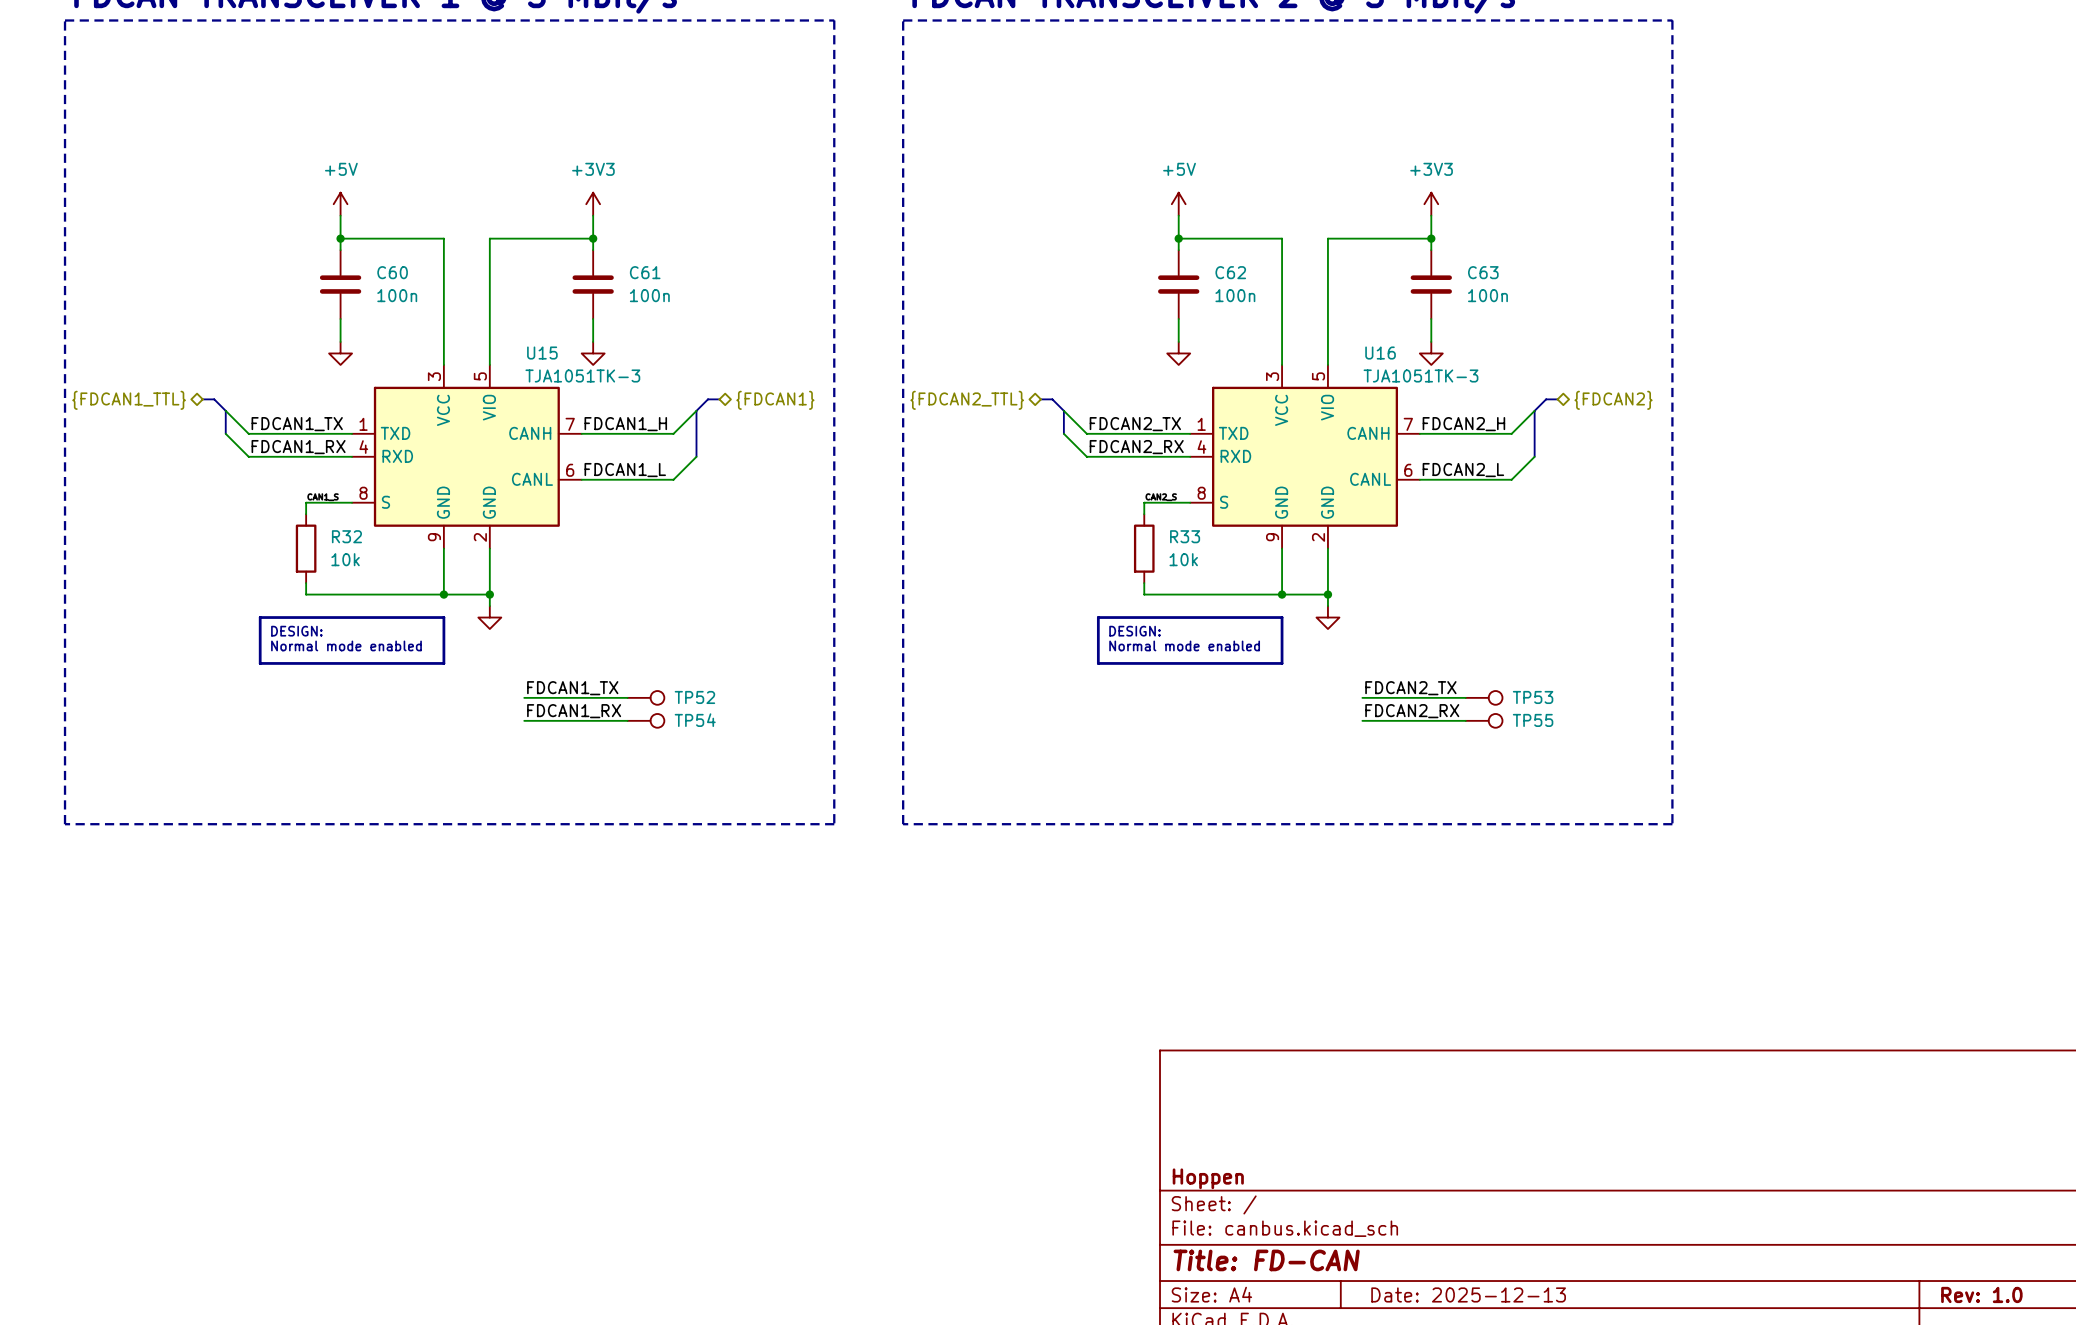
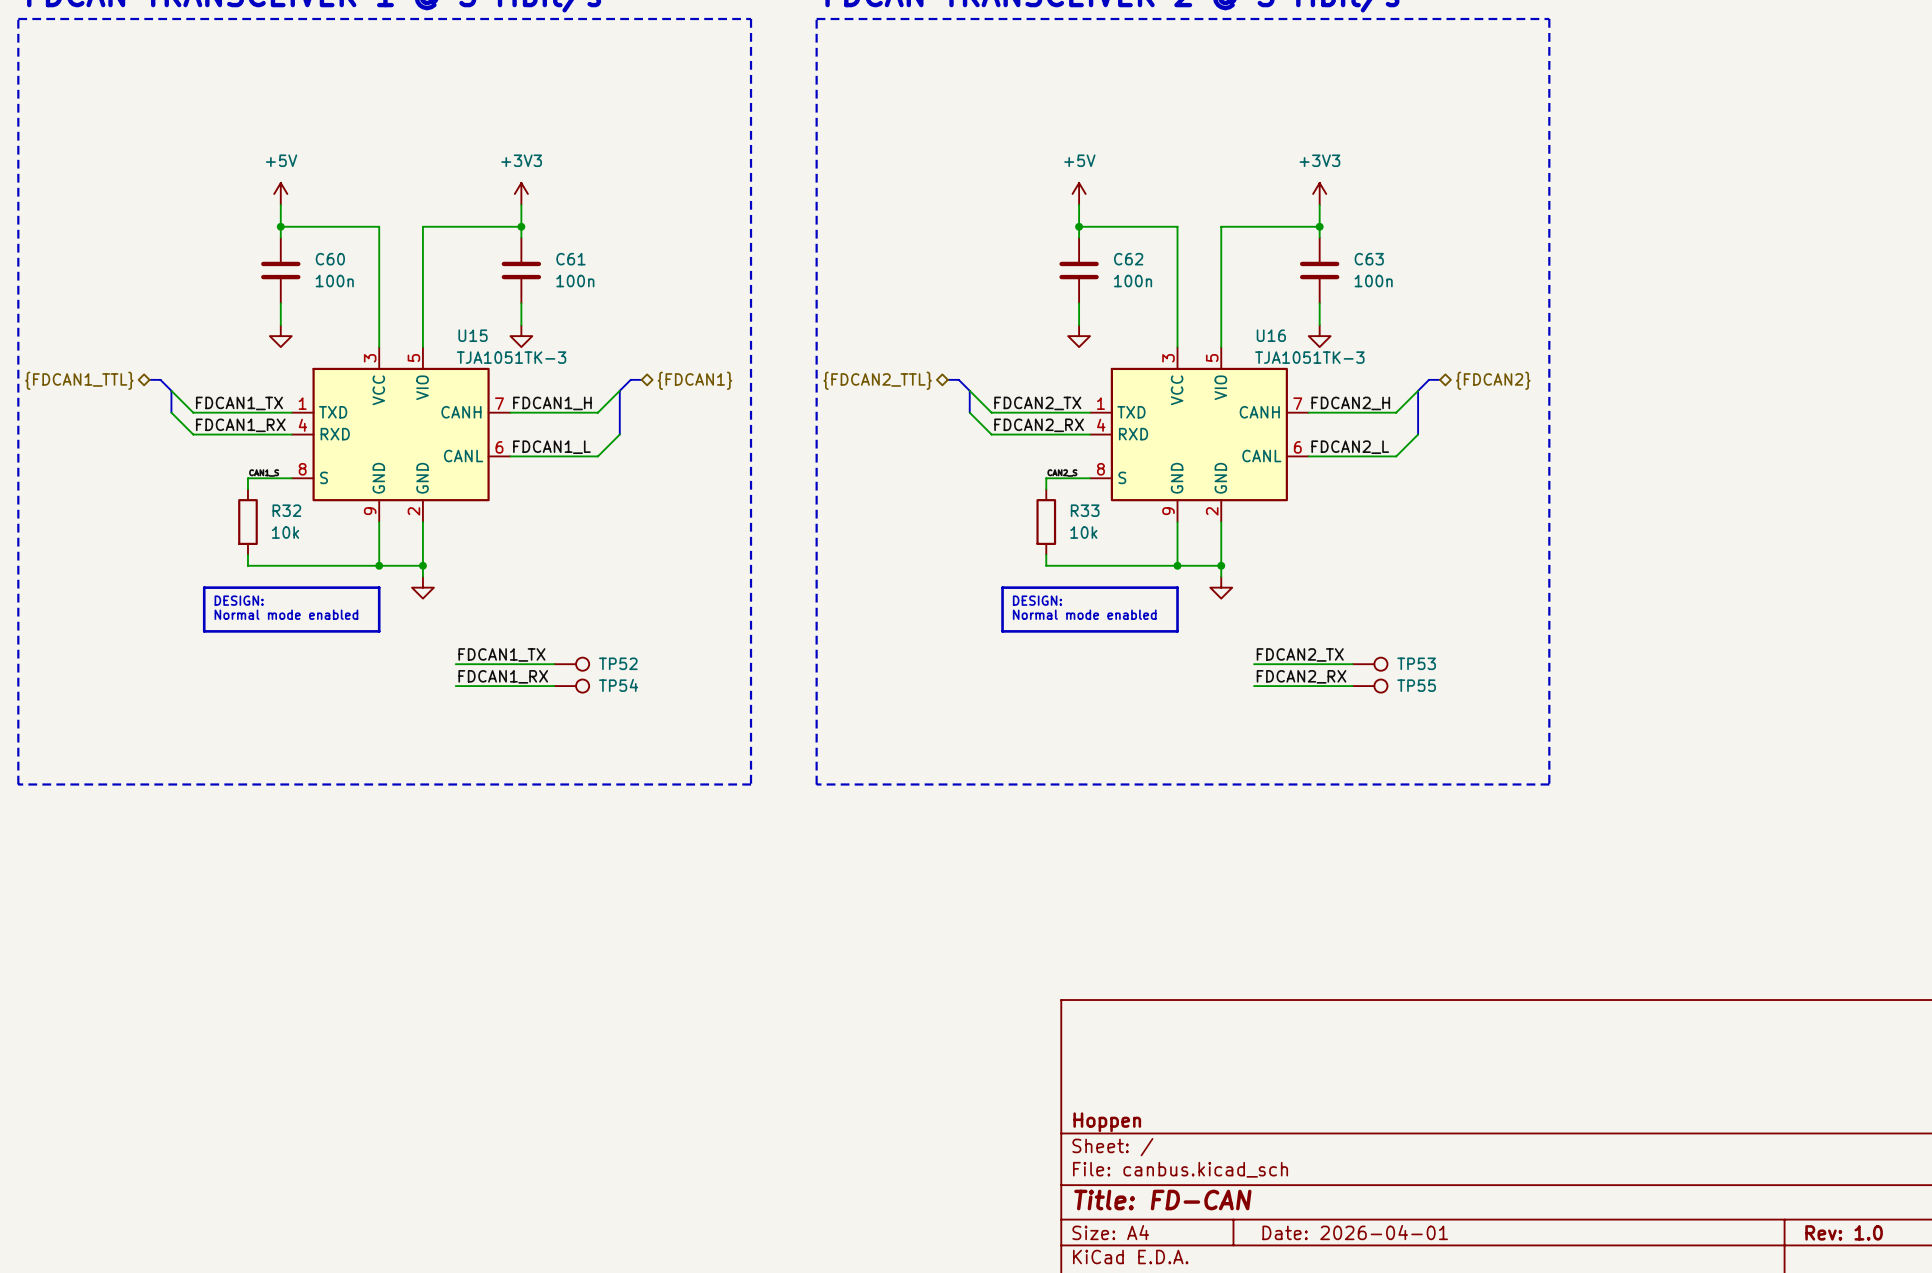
title block: Date: 2025-12-13 (1468, 1294) -> Date: 2026-04-01 (1355, 1232)

